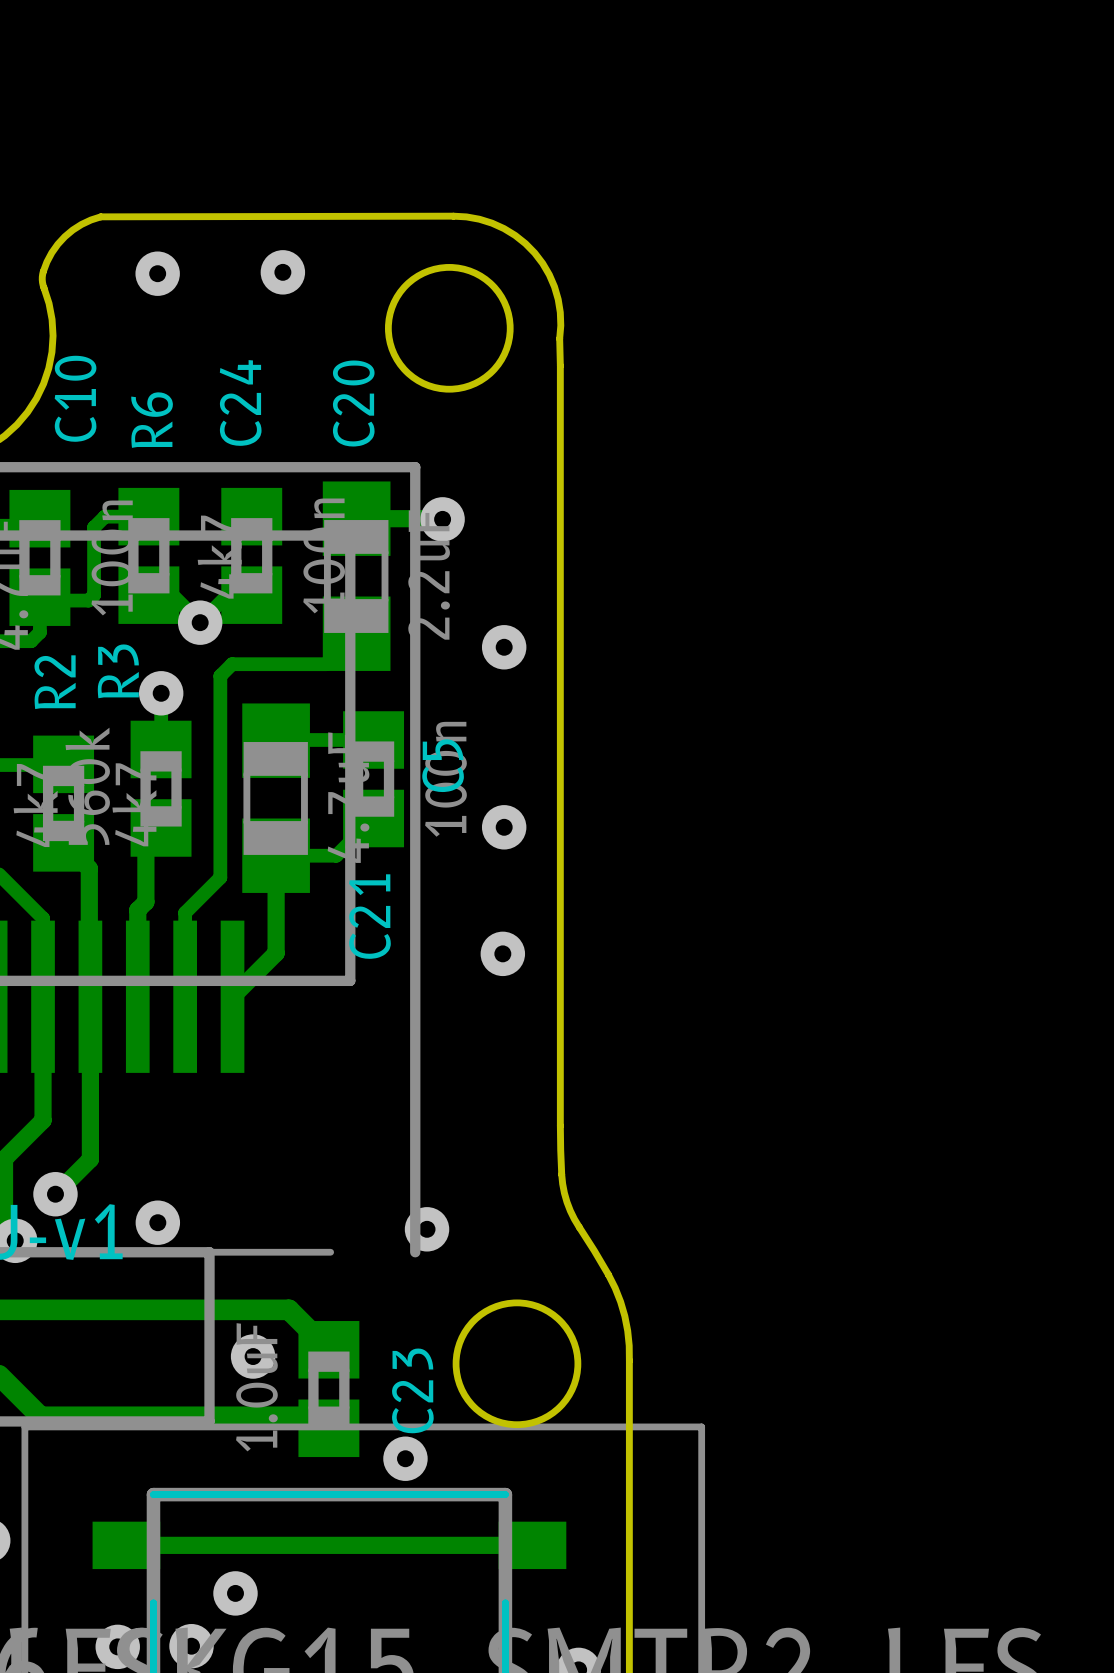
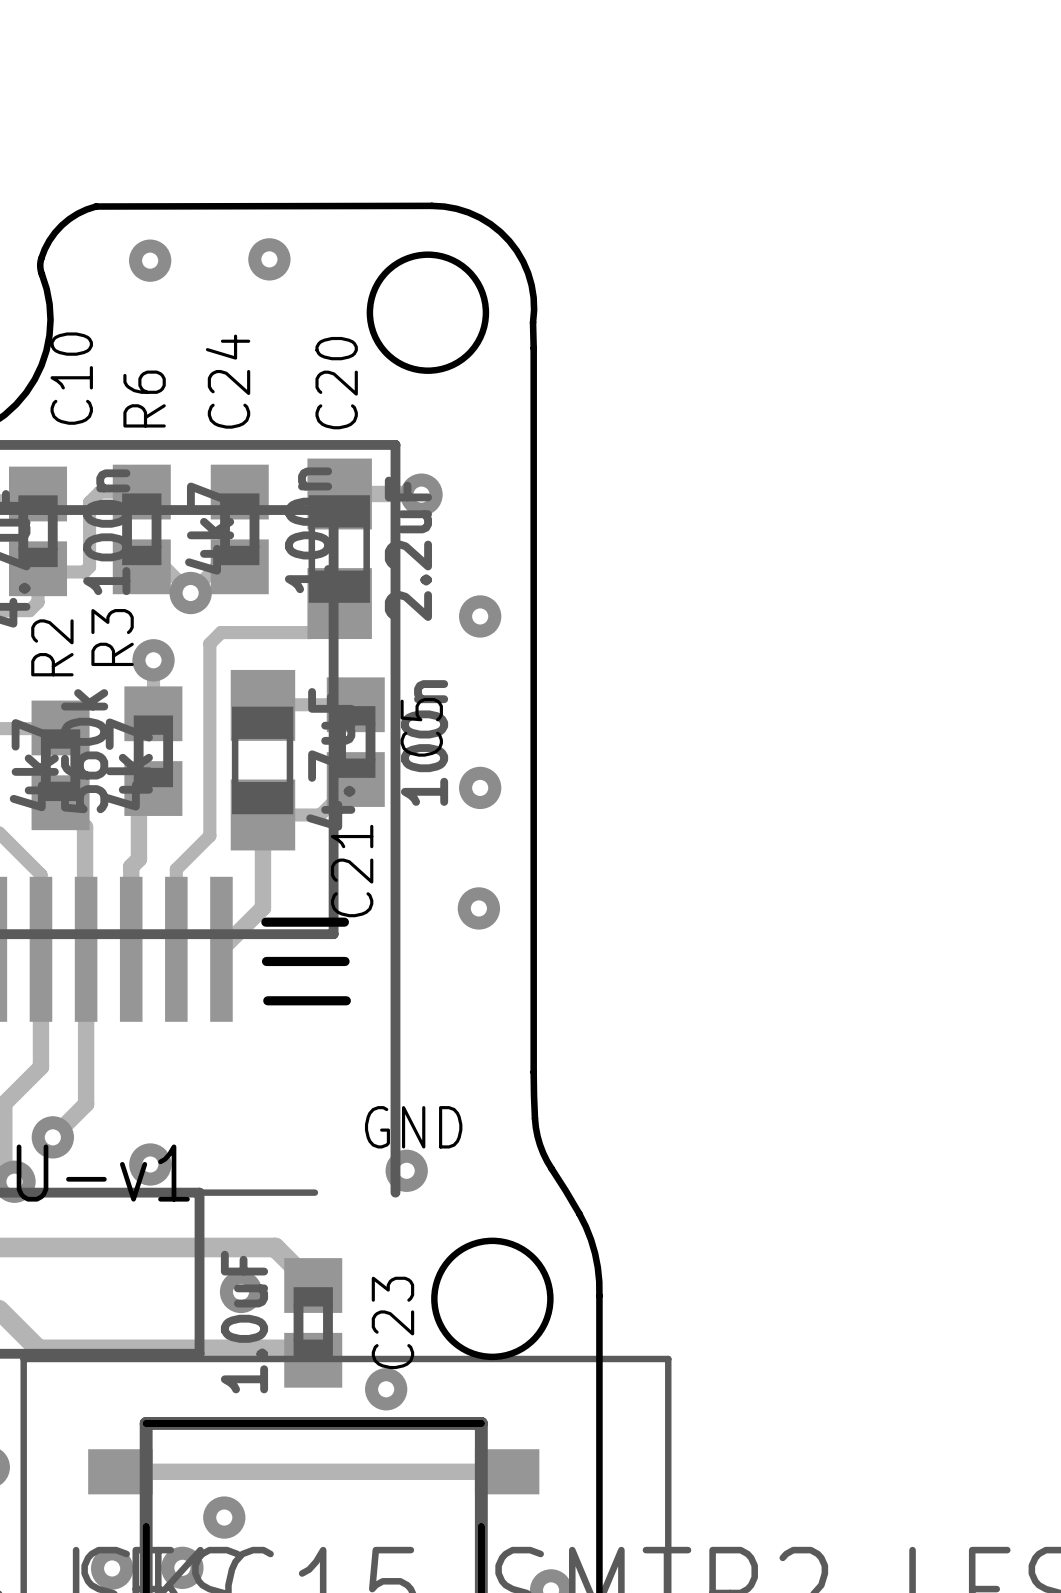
text: none -> - (305, 922)
text: none -> - (305, 961)
text: none -> - (307, 1000)
text: none -> GND (413, 1127)

